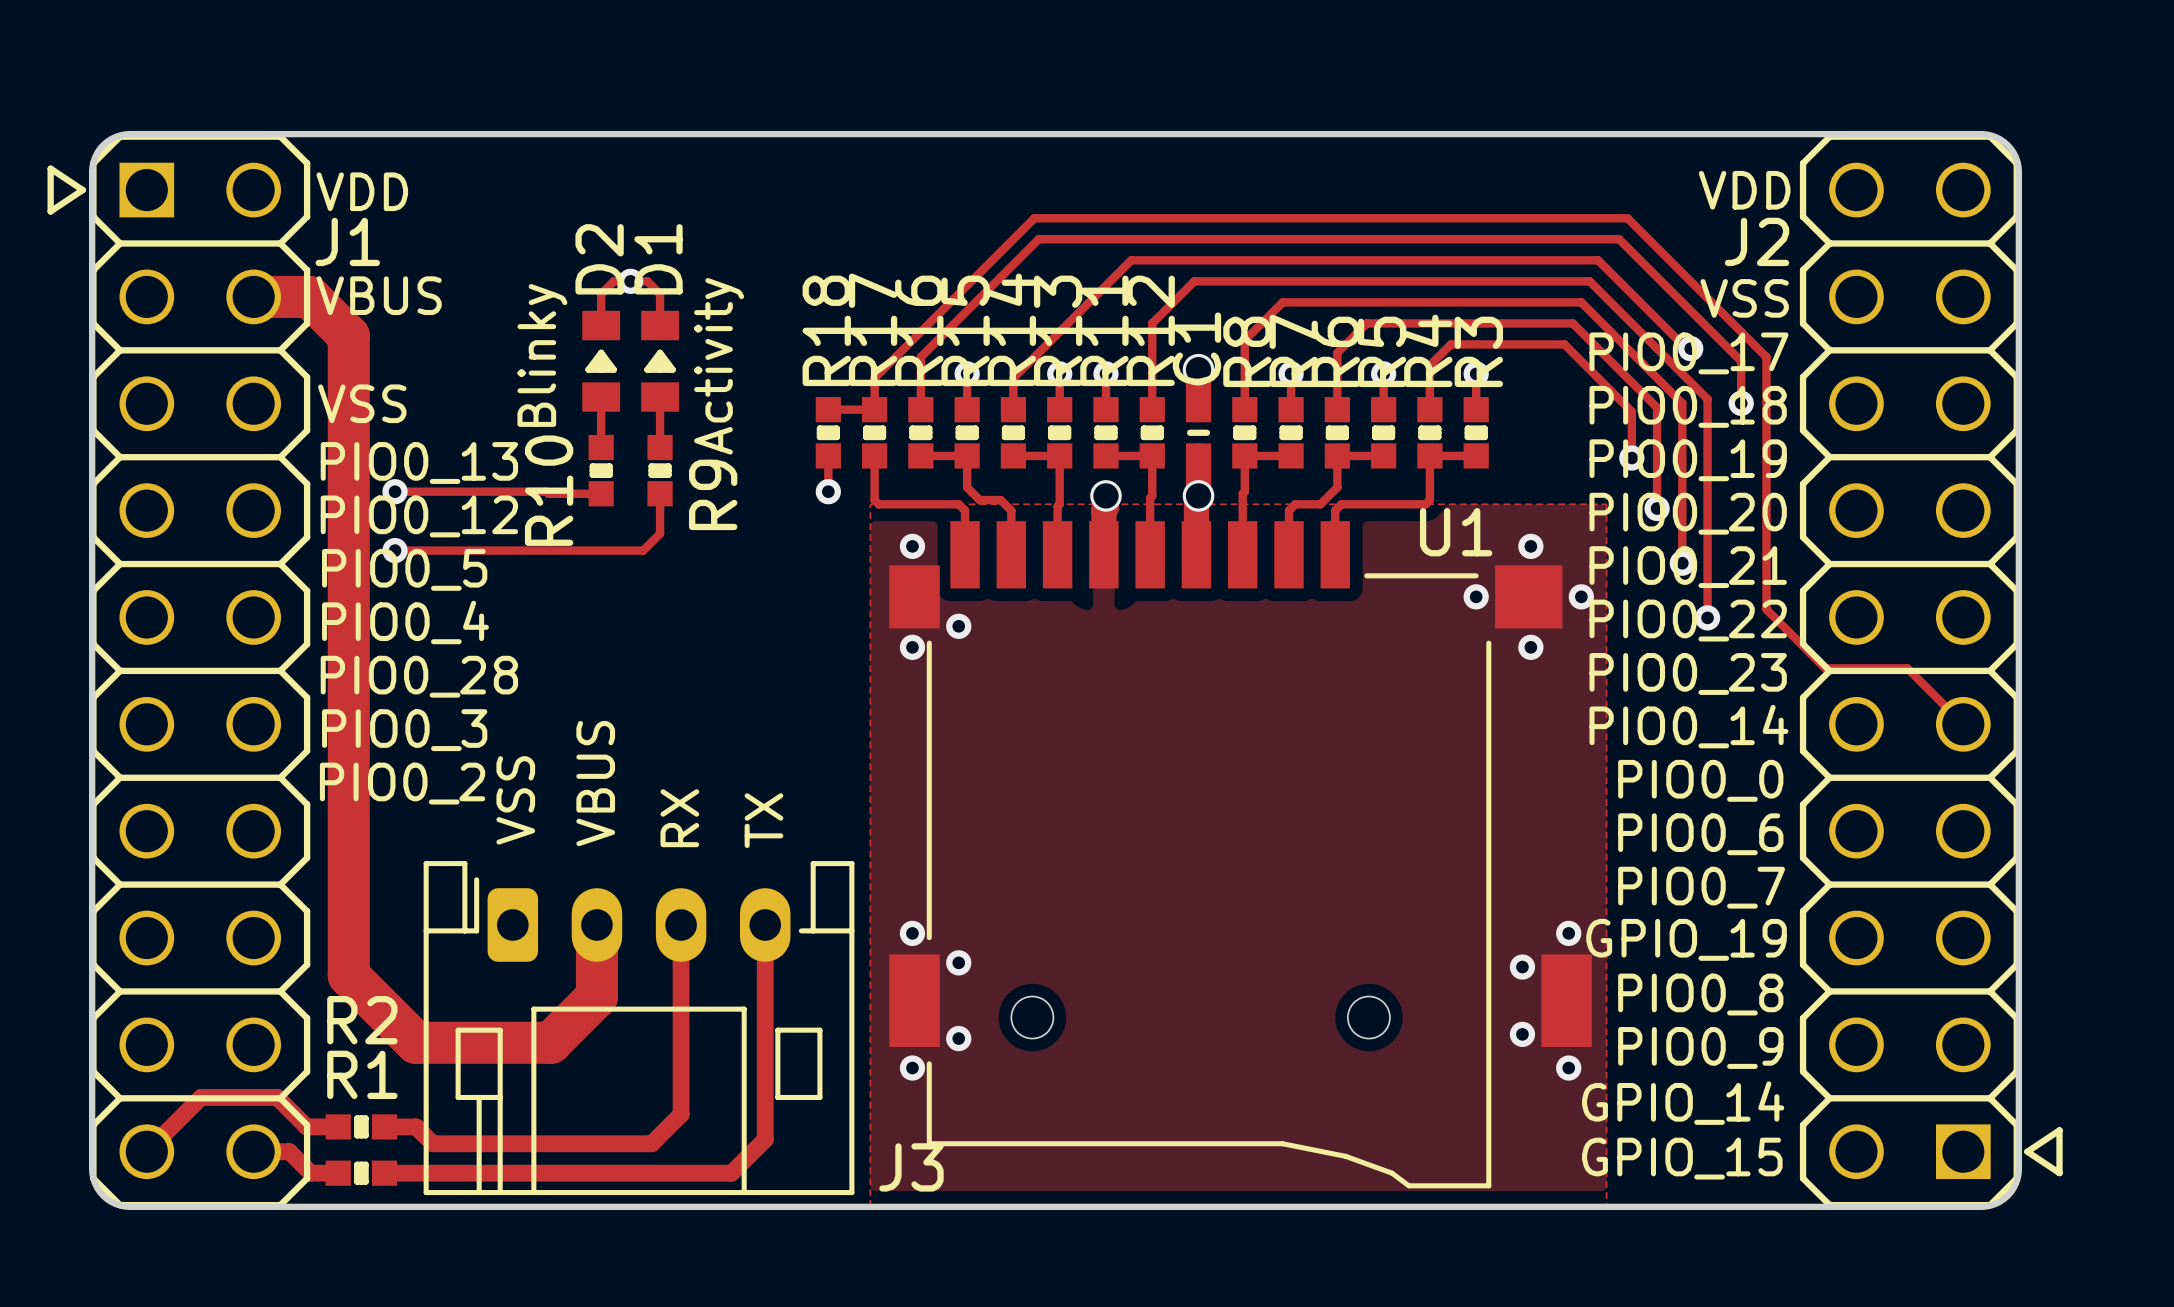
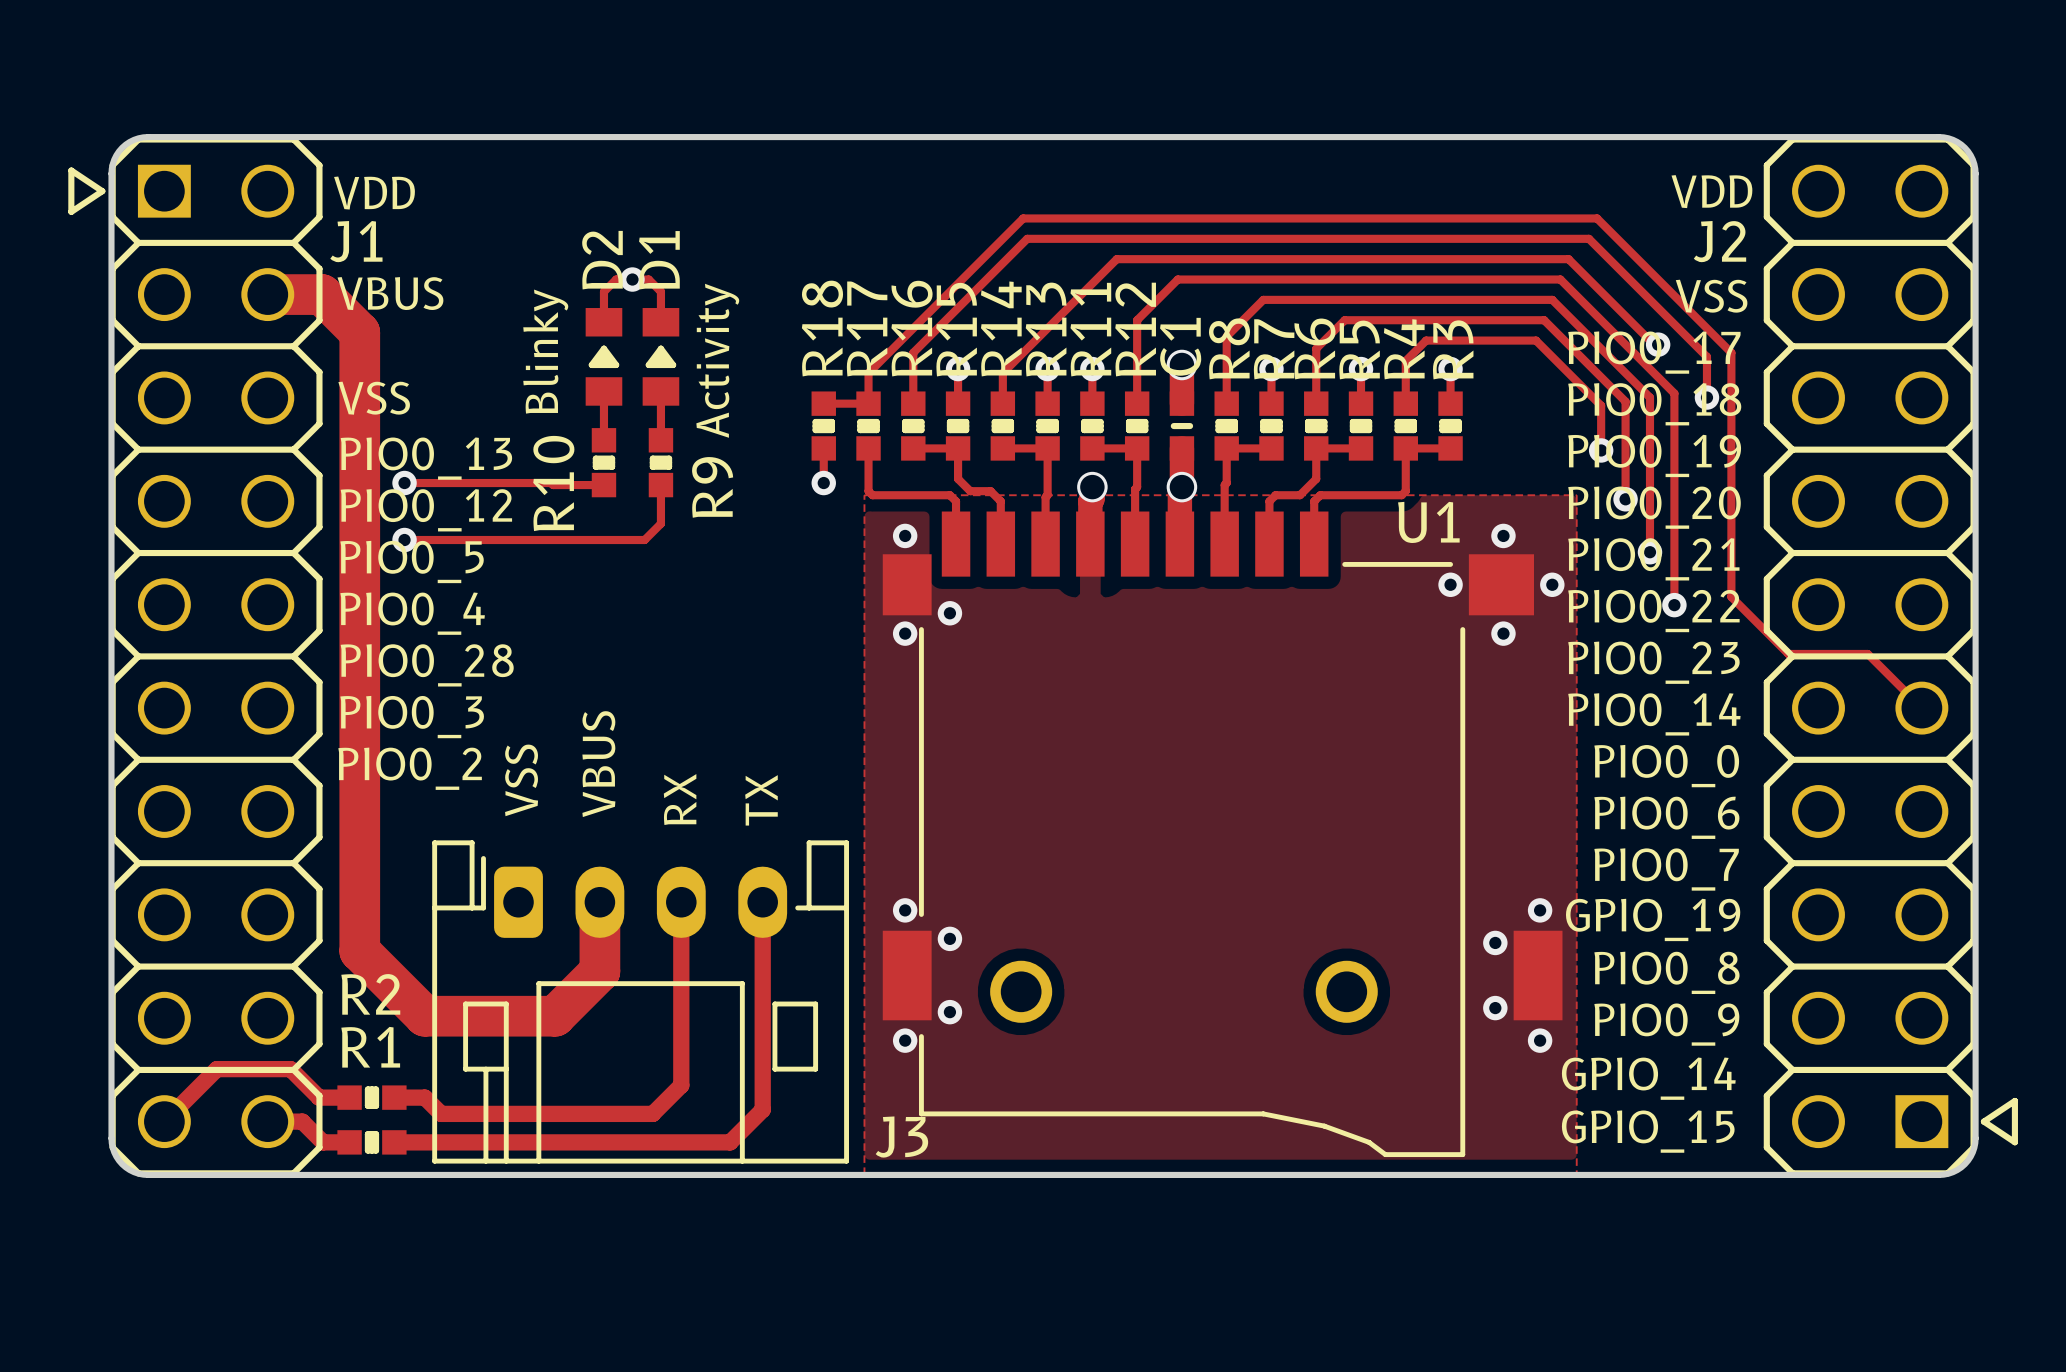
U1 footprint: [889, 521, 1592, 1189] -> [882, 511, 1563, 1158]

